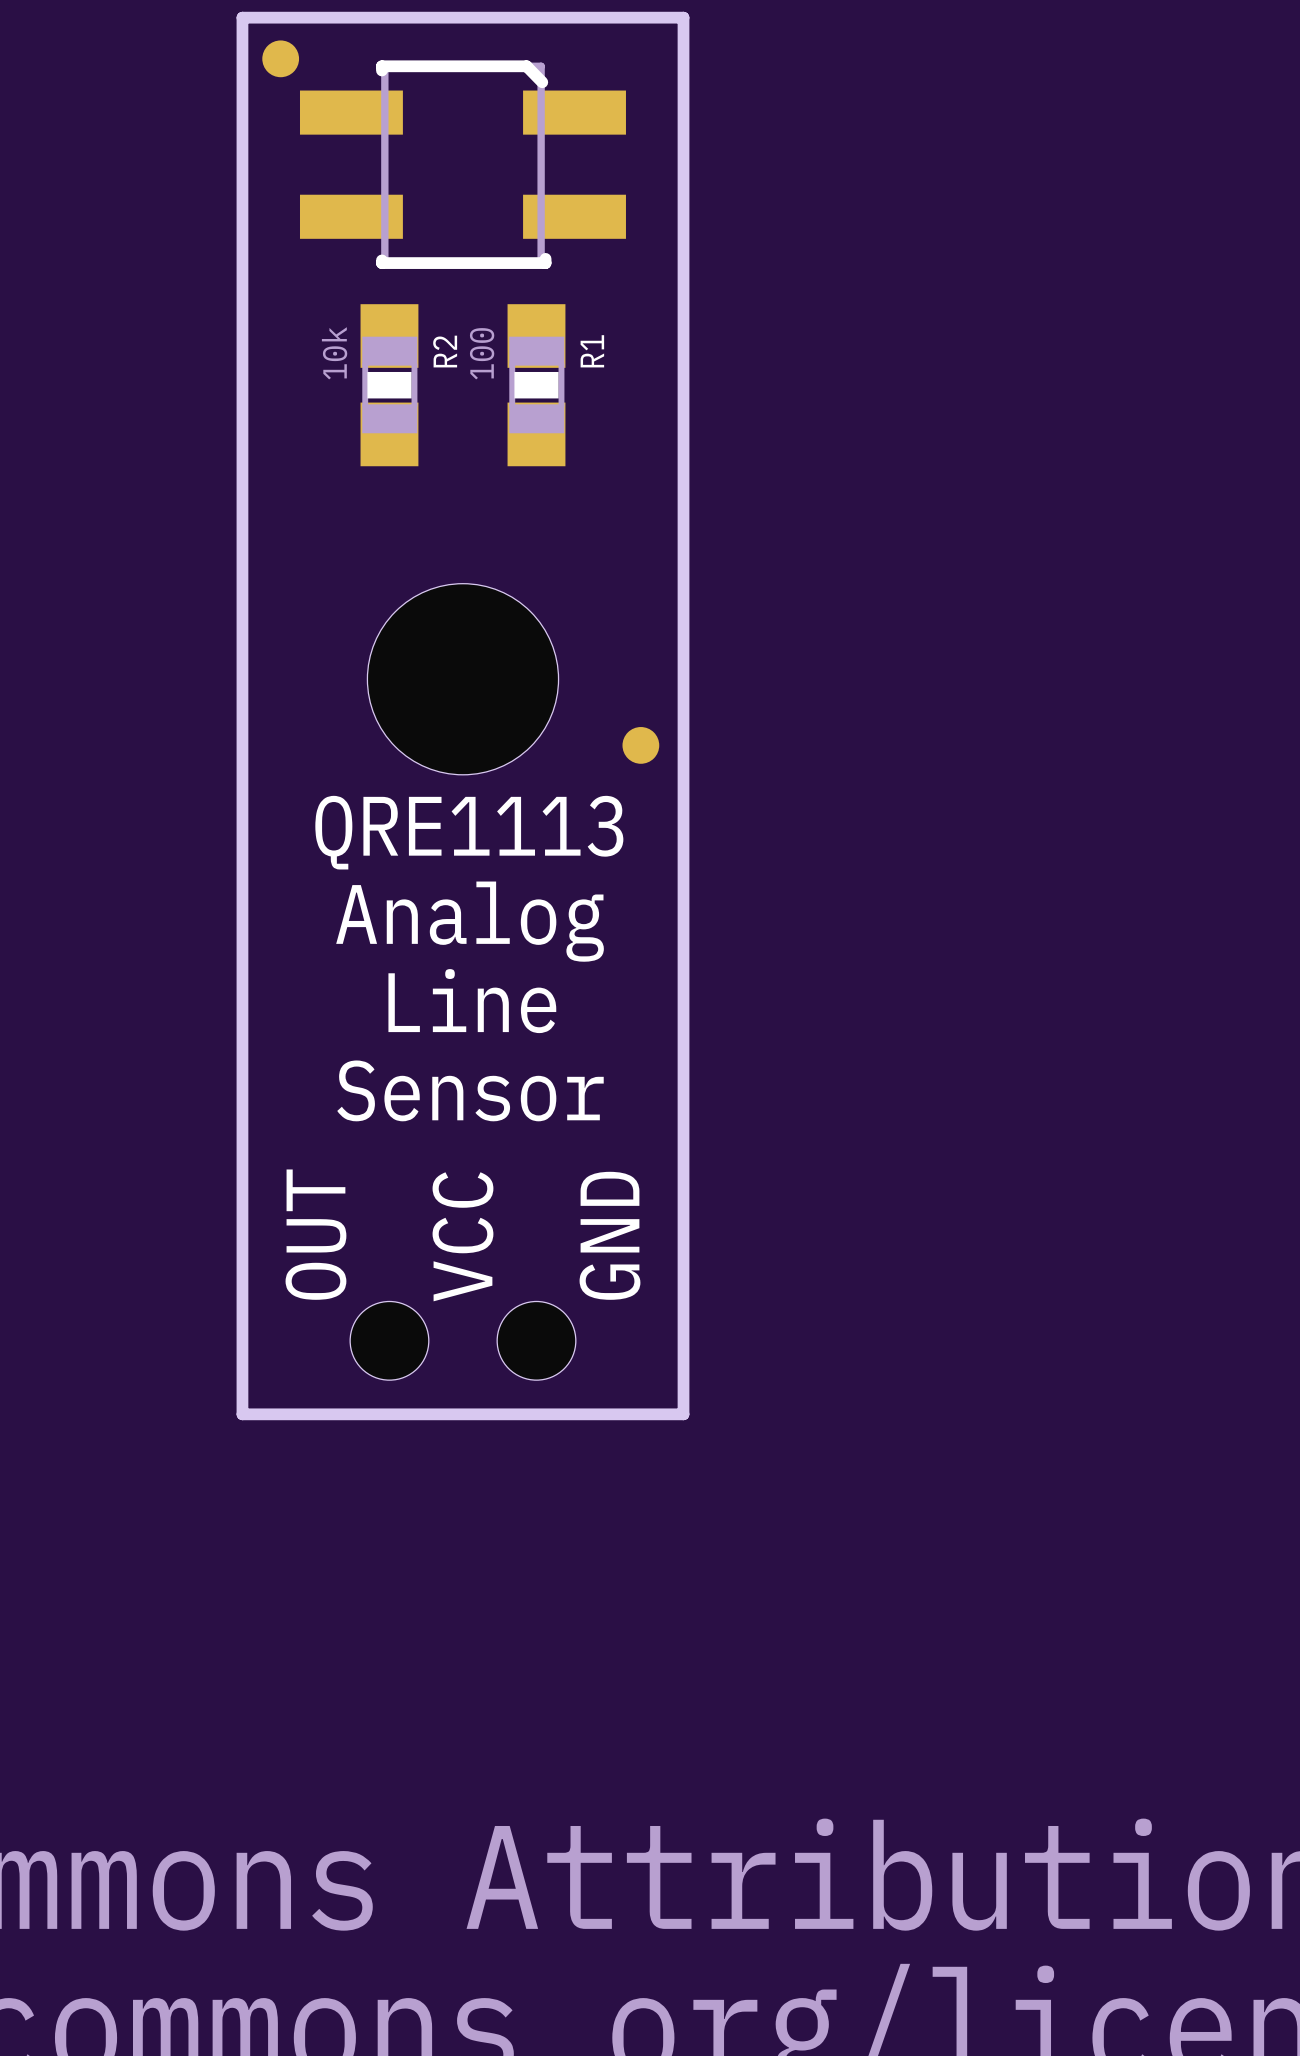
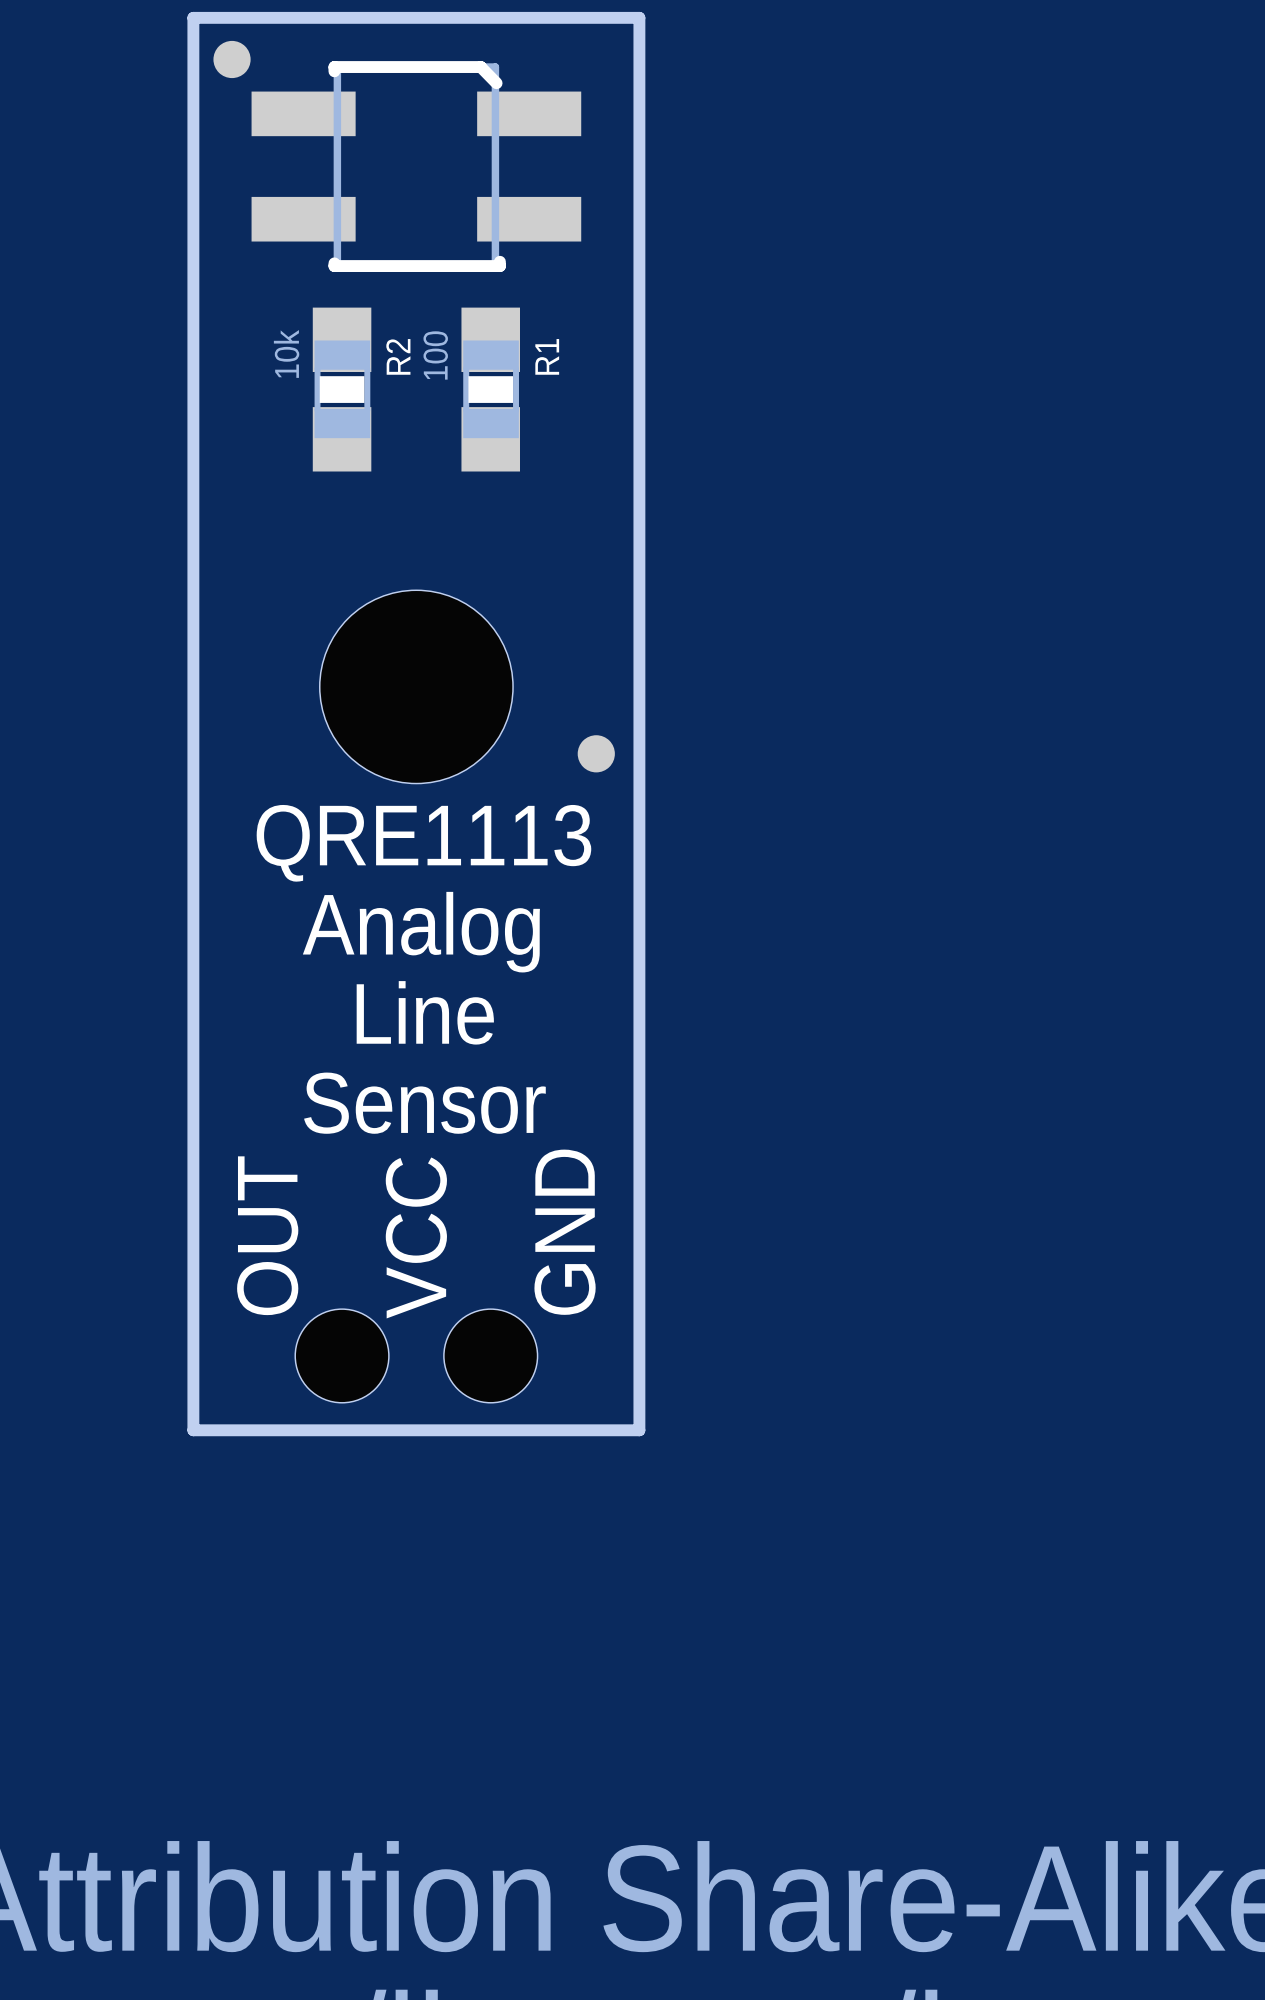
part footprint: [350, 1301, 576, 1381] -> [295, 1309, 538, 1403]

